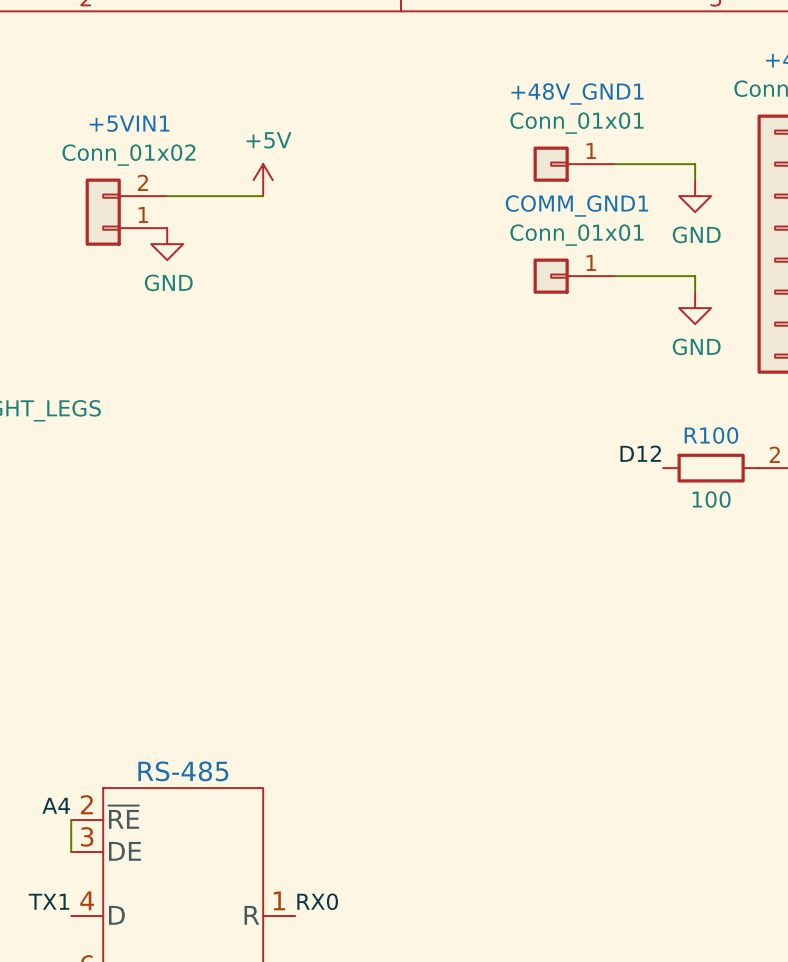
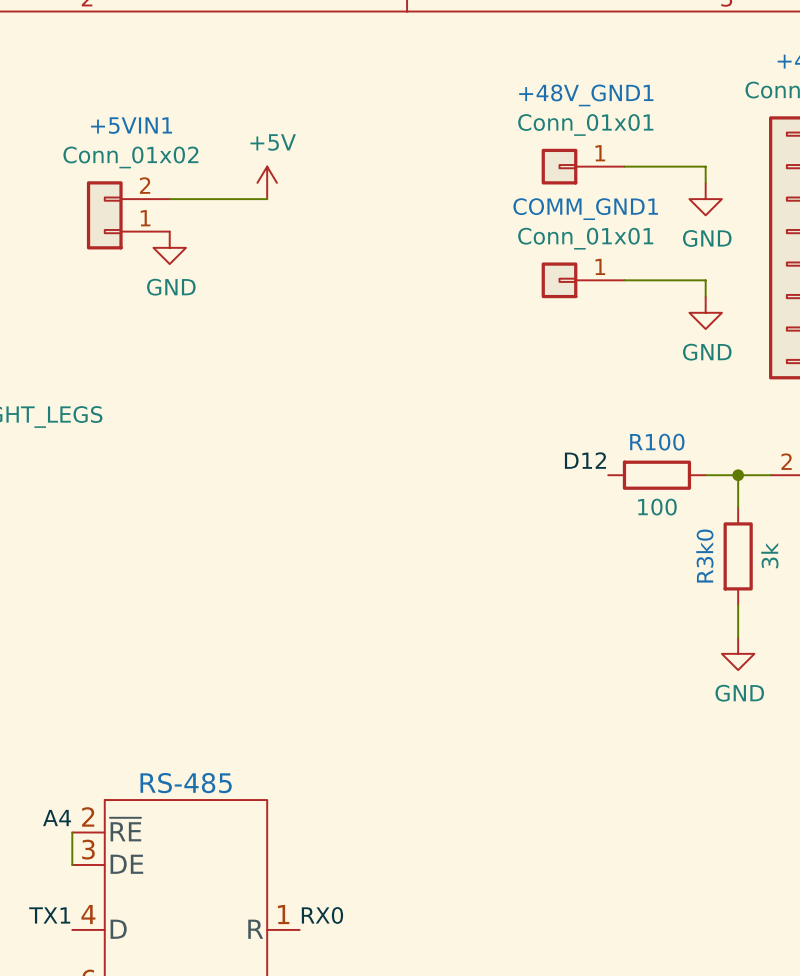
label position: D12 (640, 453) -> D12 (585, 460)
wire: none -> (705, 475) (770, 475)
R100 position: (711, 468) -> (656, 475)
wire: none -> (738, 475) (738, 507)
junction: none -> (738, 475)
R3k0: none -> 3k (738, 556)
wire: none -> (738, 605) (738, 637)
power symbol: none -> GND (738, 653)

